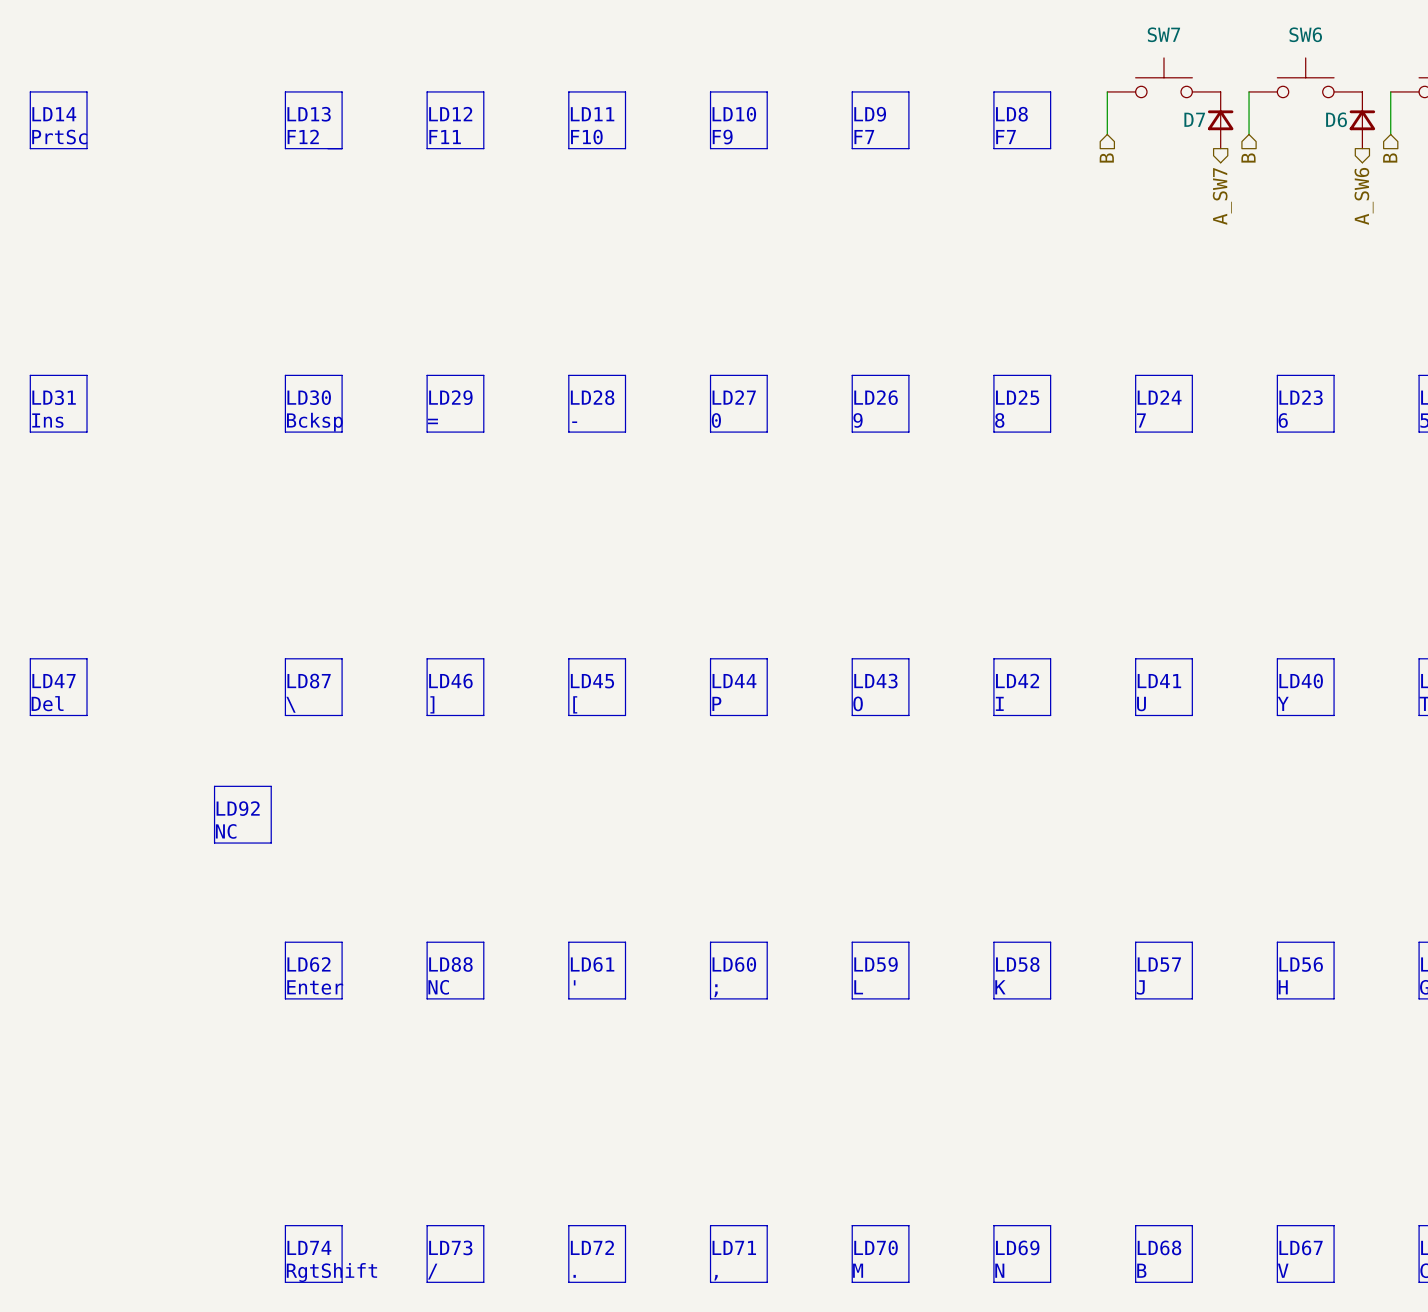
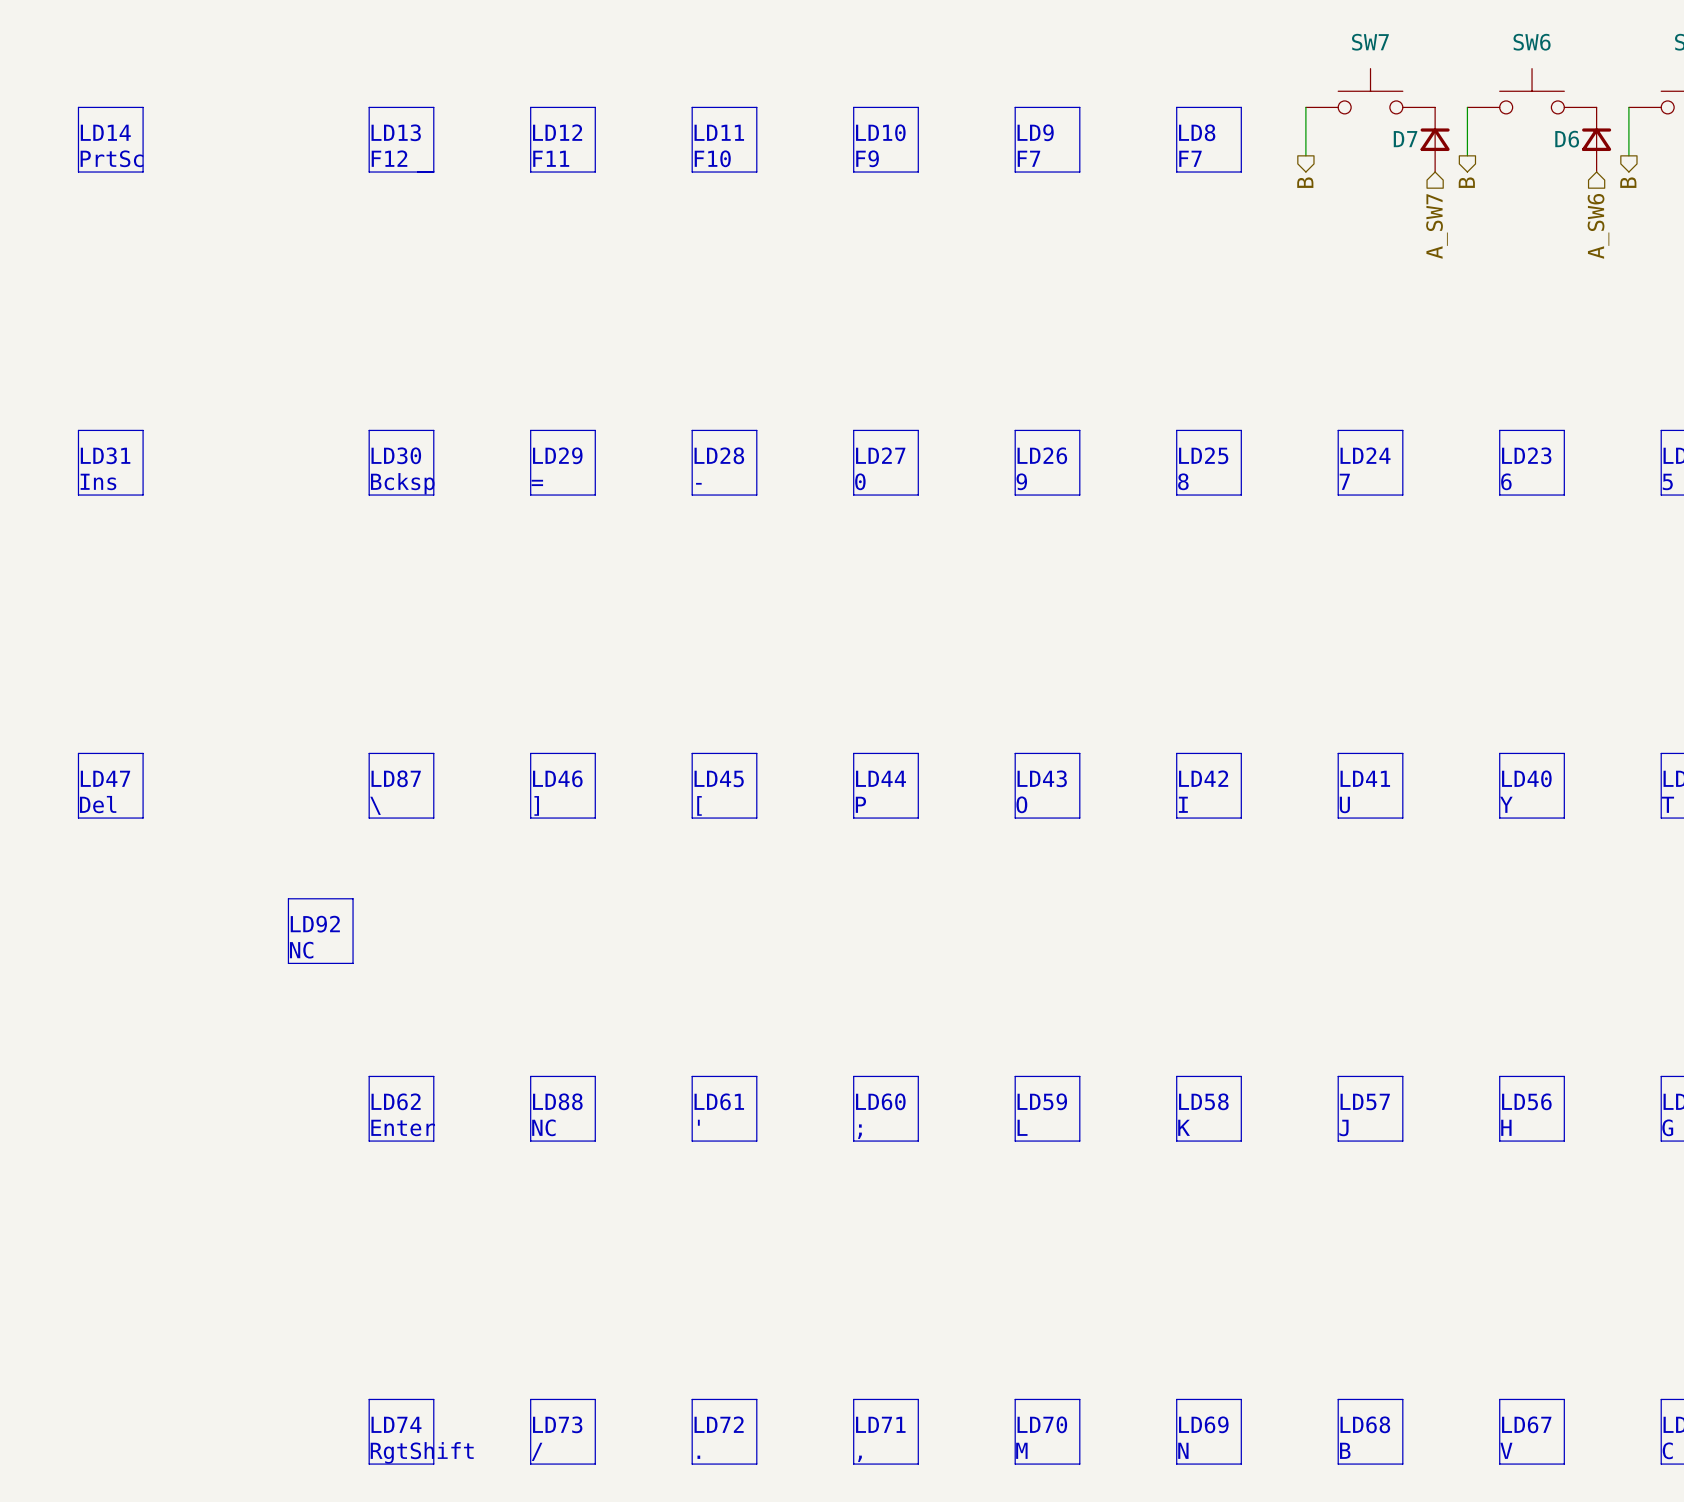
hierarchical label shape: input (1106, 157) -> output (1305, 182)
hierarchical label shape: input (1248, 157) -> output (1466, 182)
hierarchical label shape: input (1390, 157) -> output (1628, 182)
hierarchical label shape: output (1222, 196) -> input (1436, 226)
hierarchical label shape: output (1364, 196) -> input (1598, 226)

